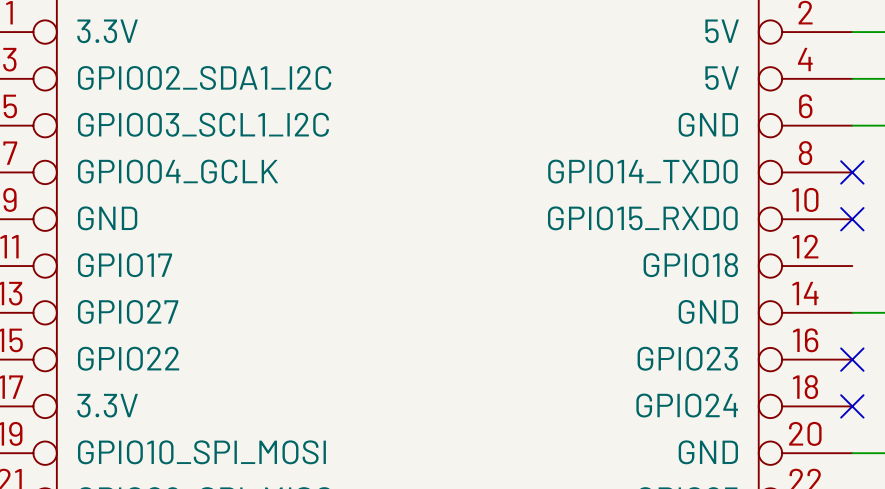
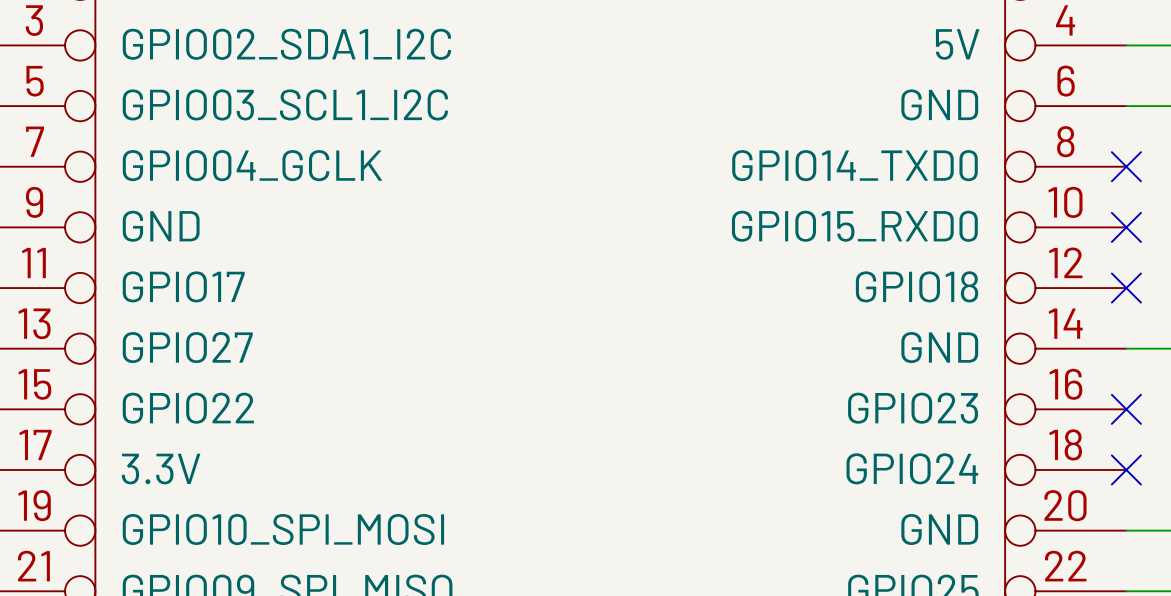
no-connect mark: none -> (1126, 288)

